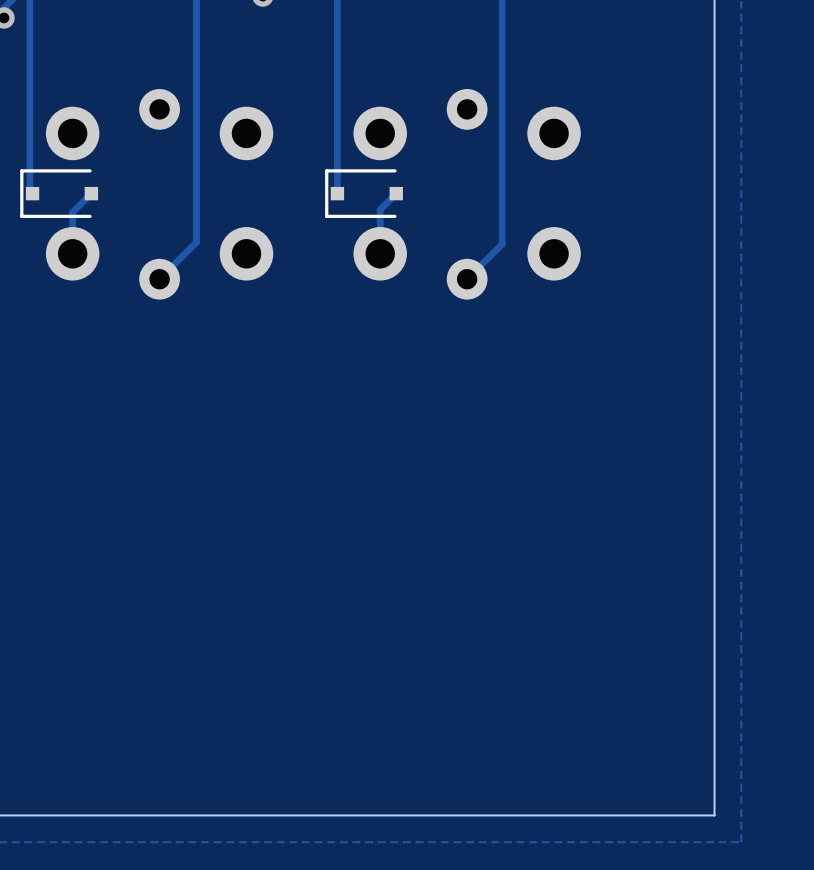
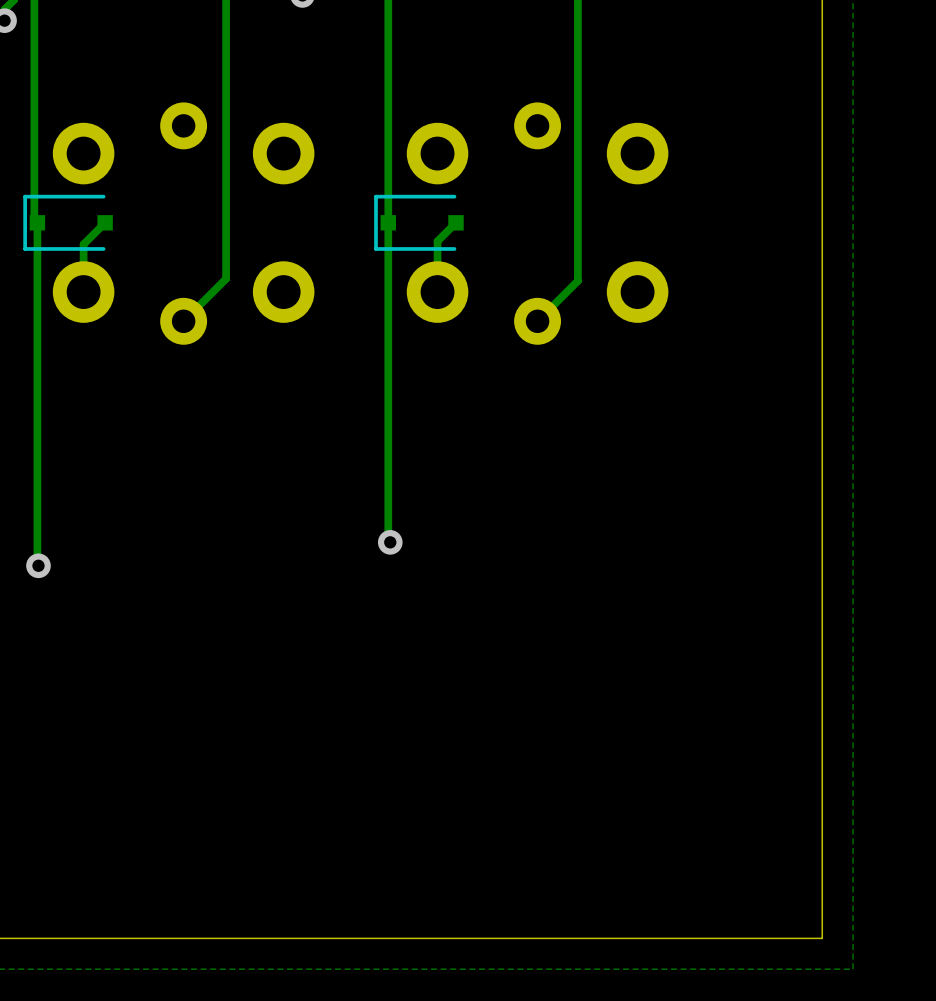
track: none -> (37, 222) (38, 565)
track: none -> (388, 222) (388, 540) (390, 542)
via: none -> (390, 542)
via: none -> (38, 565)

